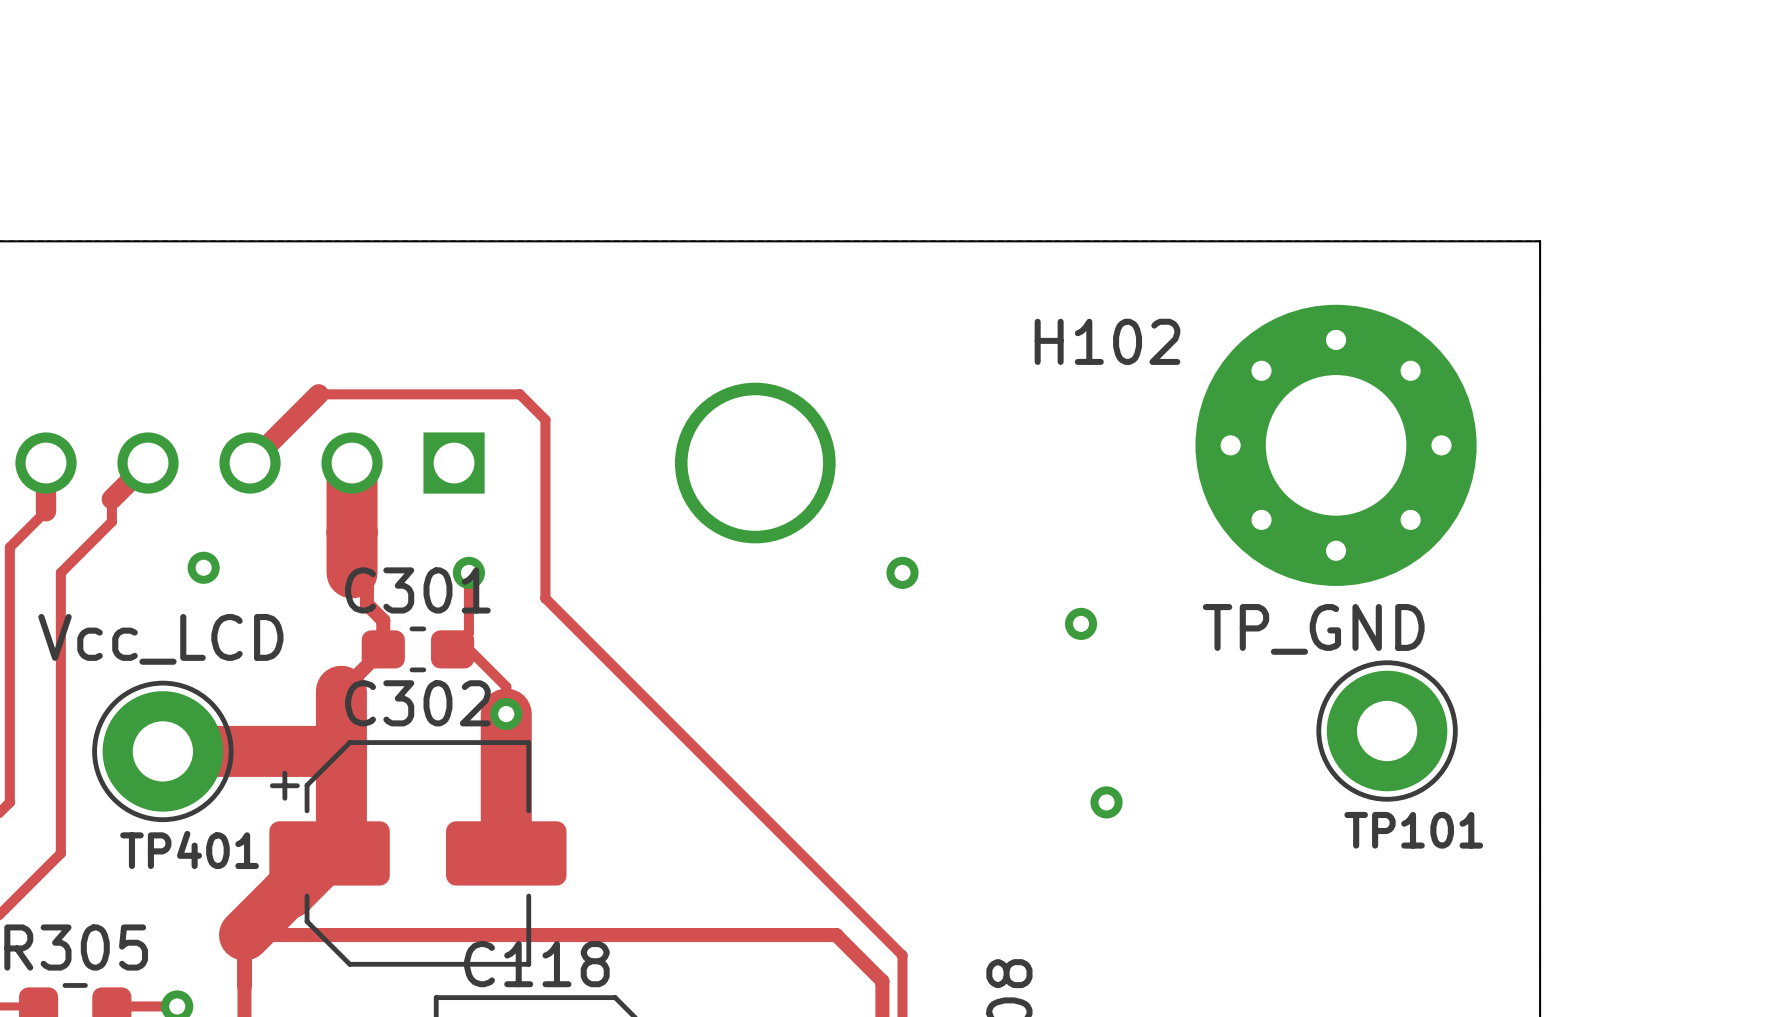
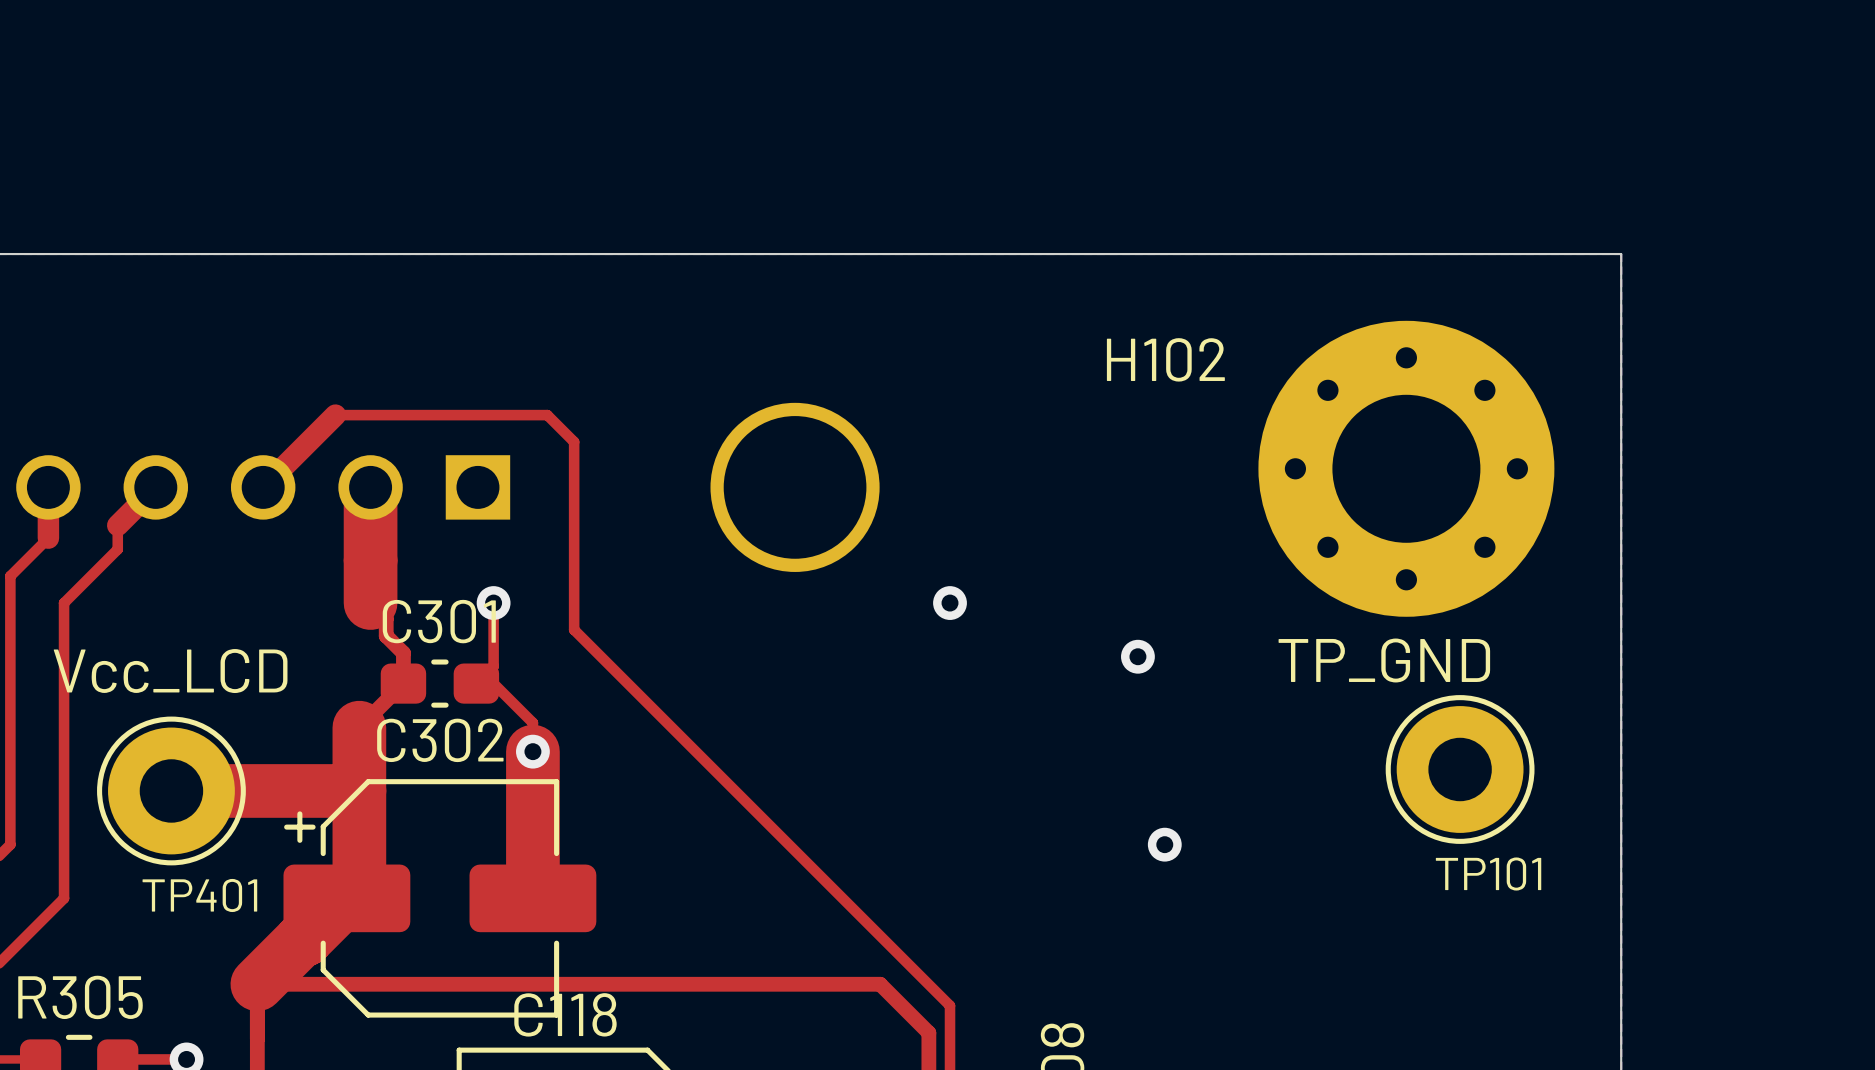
via: (203, 567) -> none

